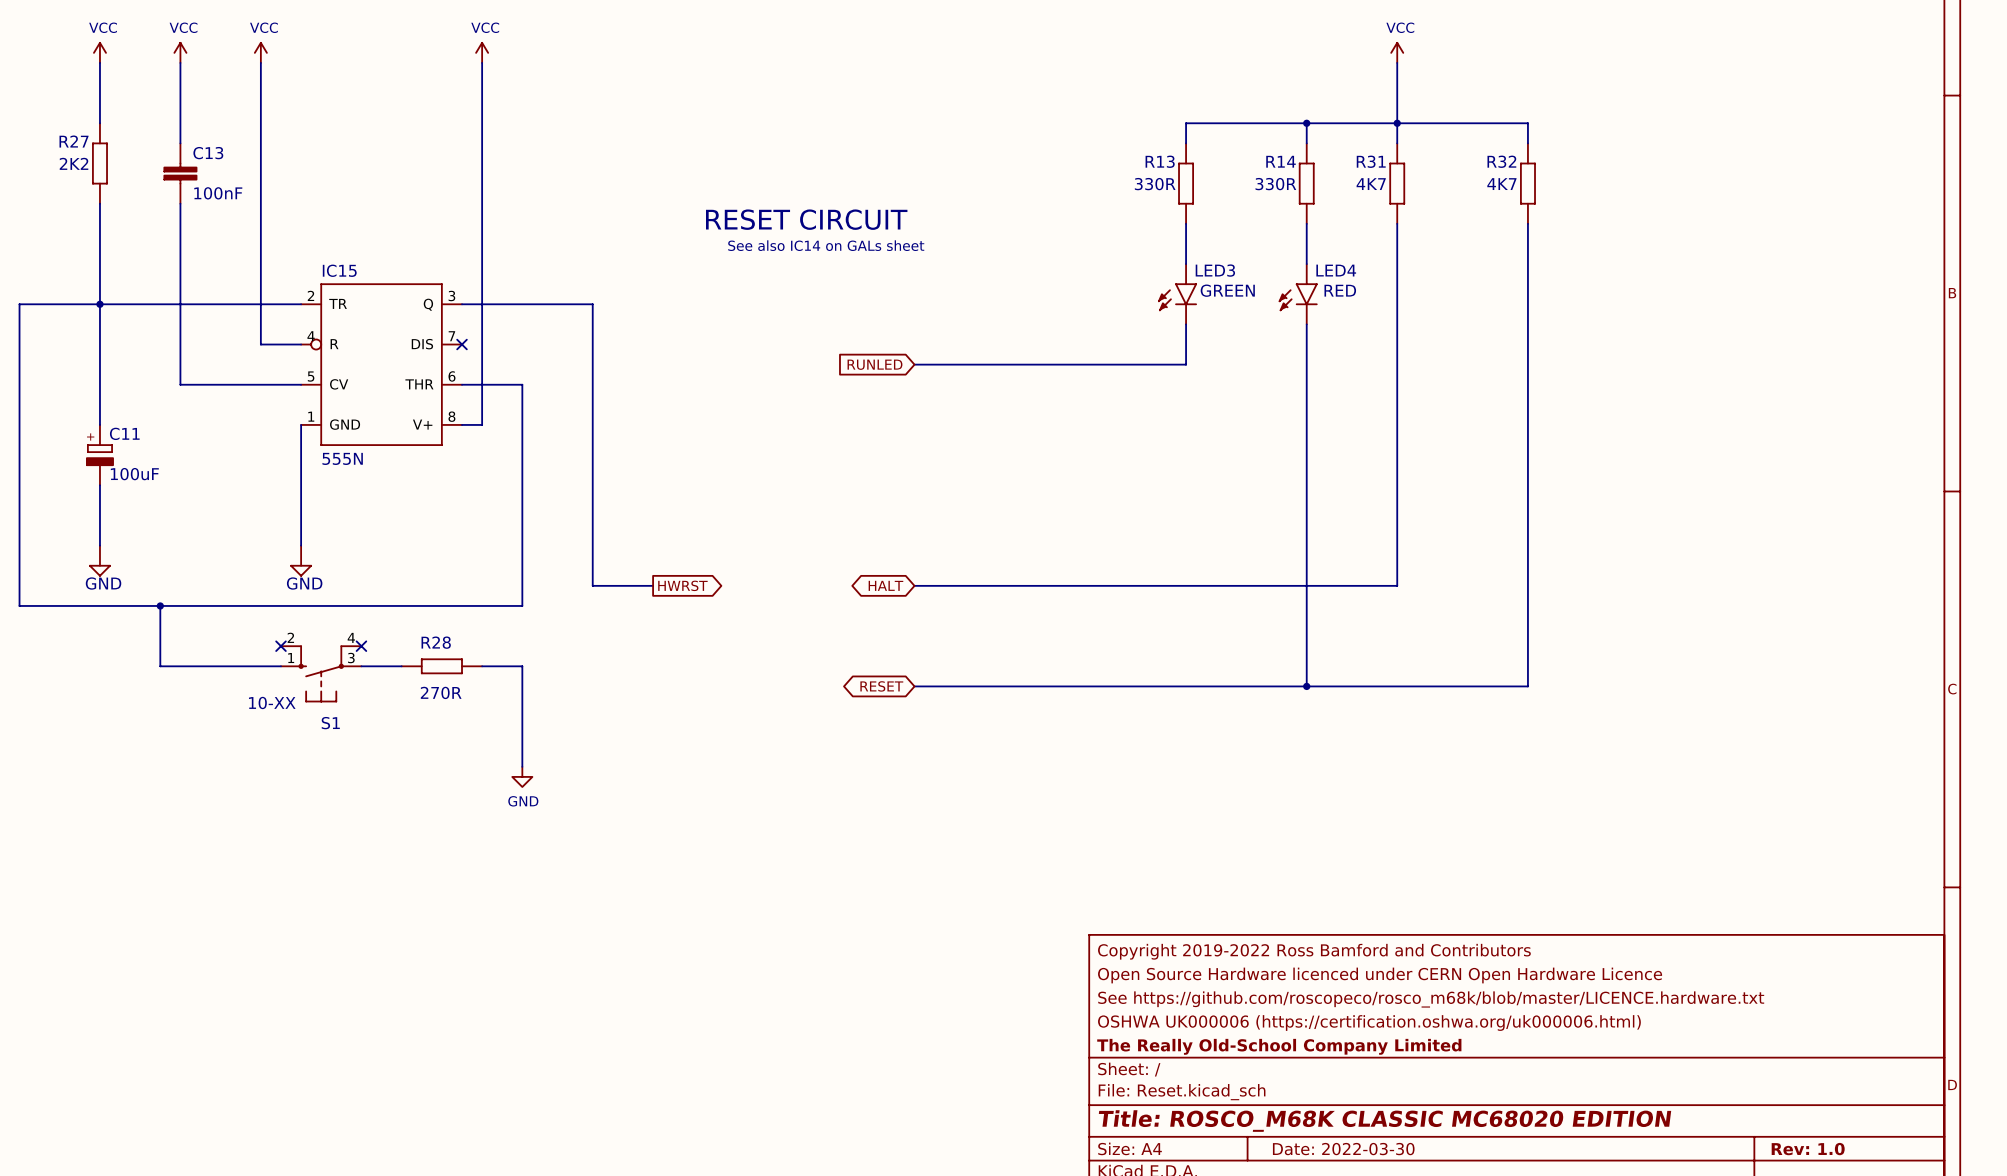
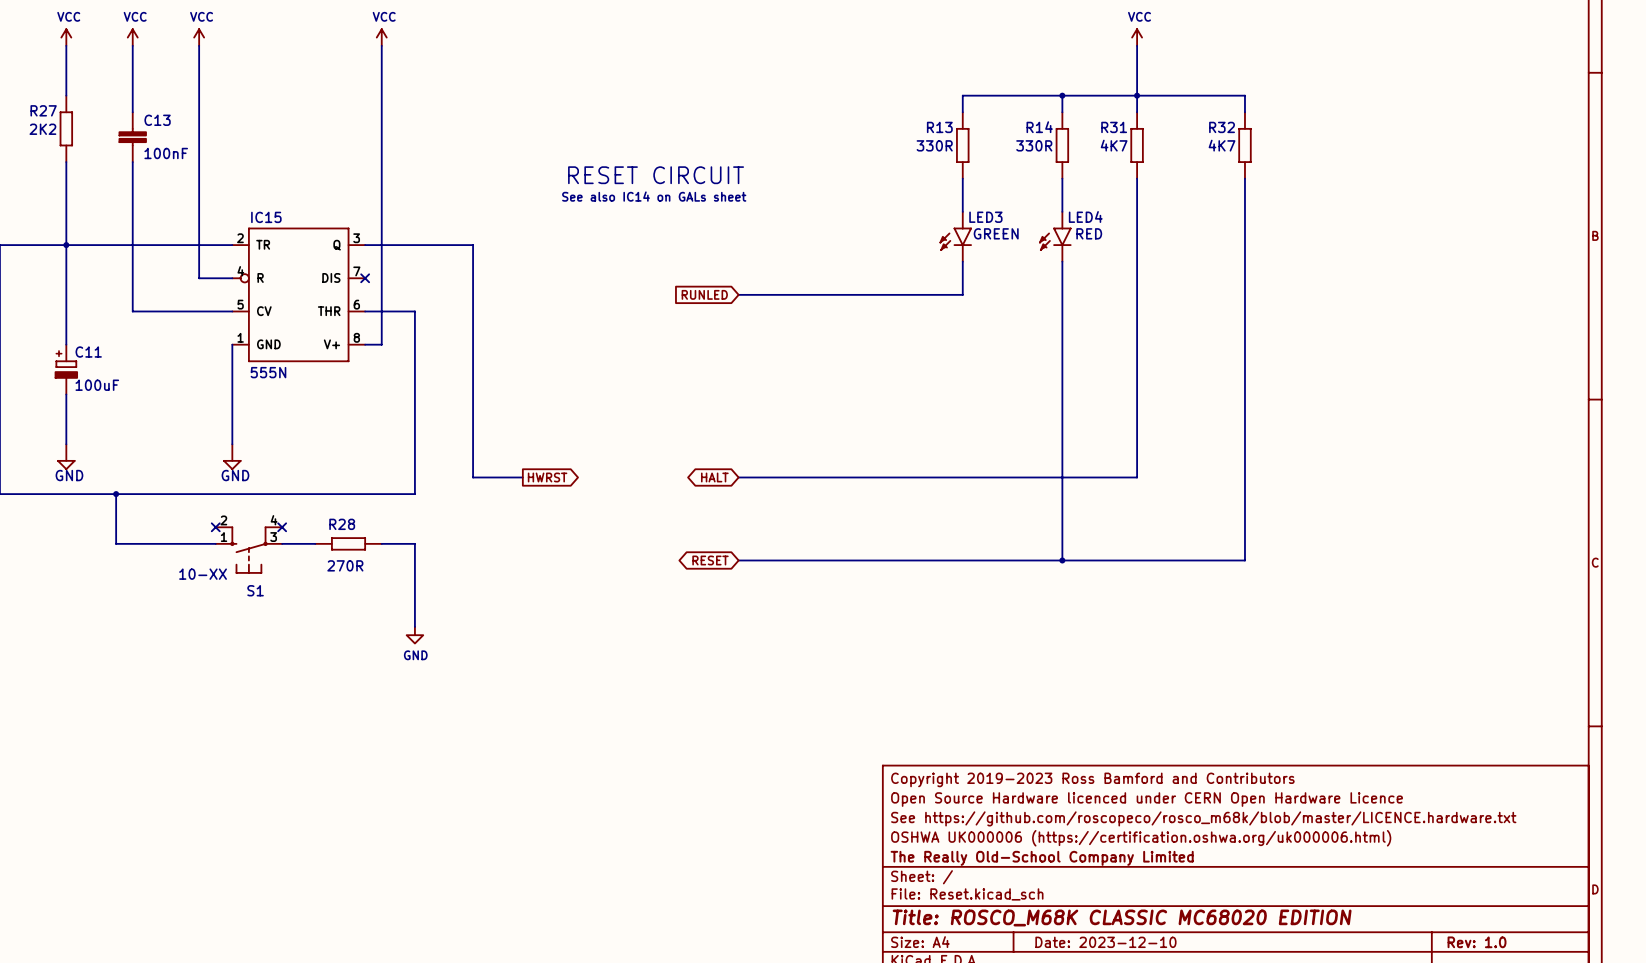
title block: Copyright 2019-2022 Ross Bamford and Contributors (1314, 951) -> Copyright 2019-2023 Ross Bamford and Contributors (1092, 779)
title block: Date: 2022-03-30 (1343, 1149) -> Date: 2023-12-10 (1105, 942)

